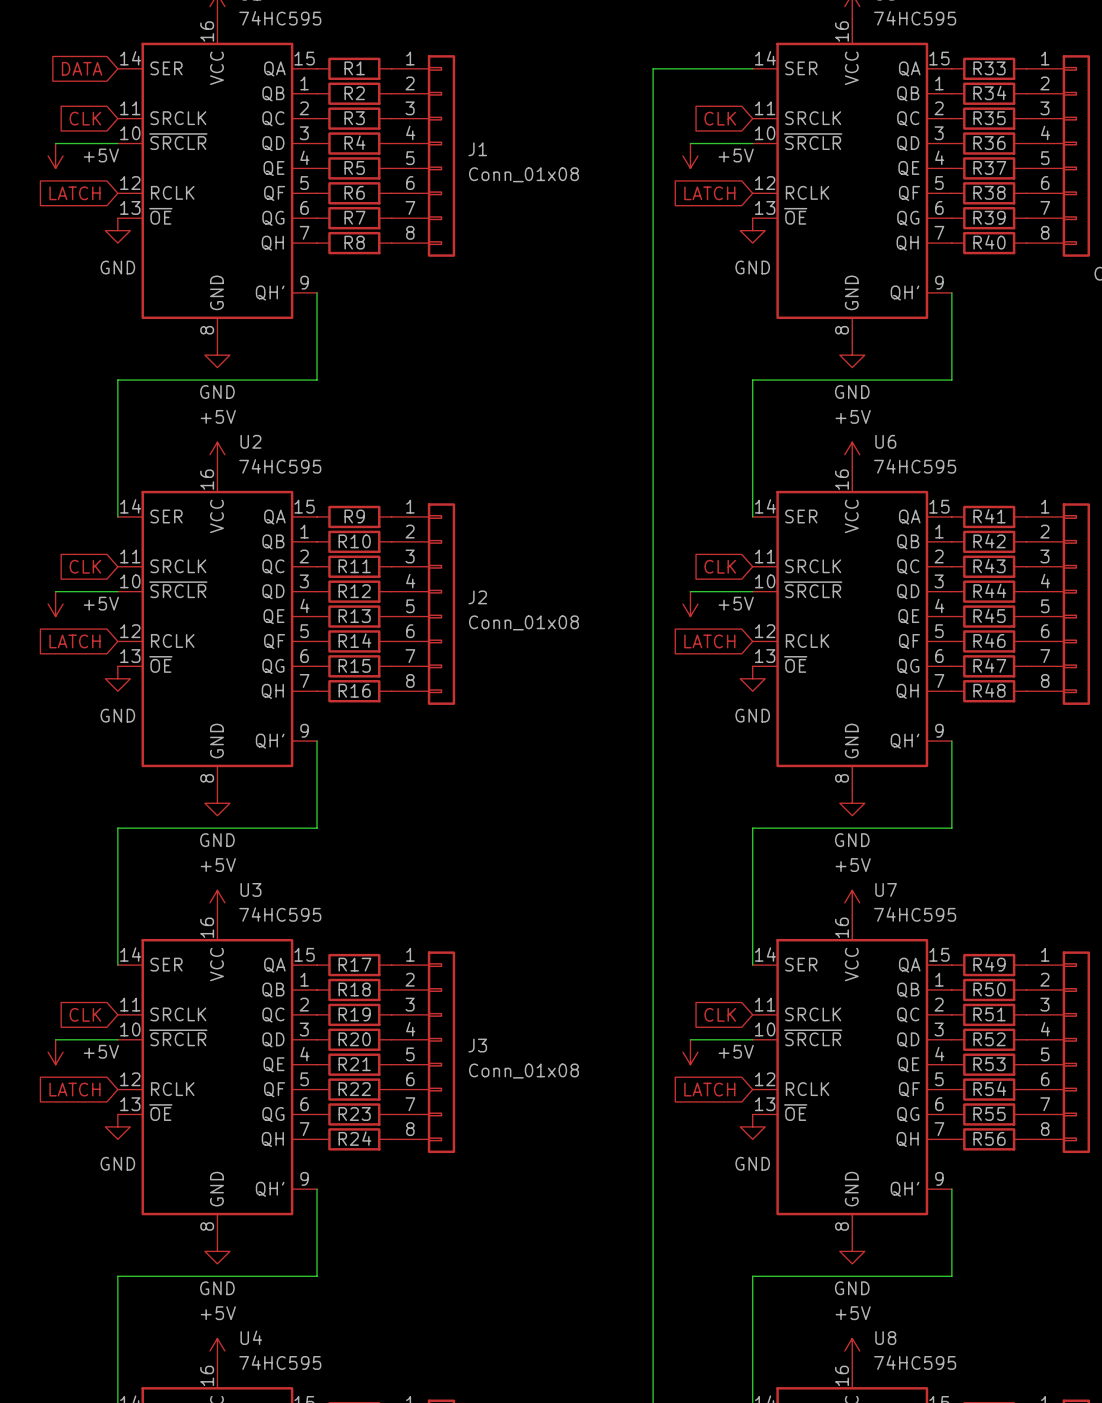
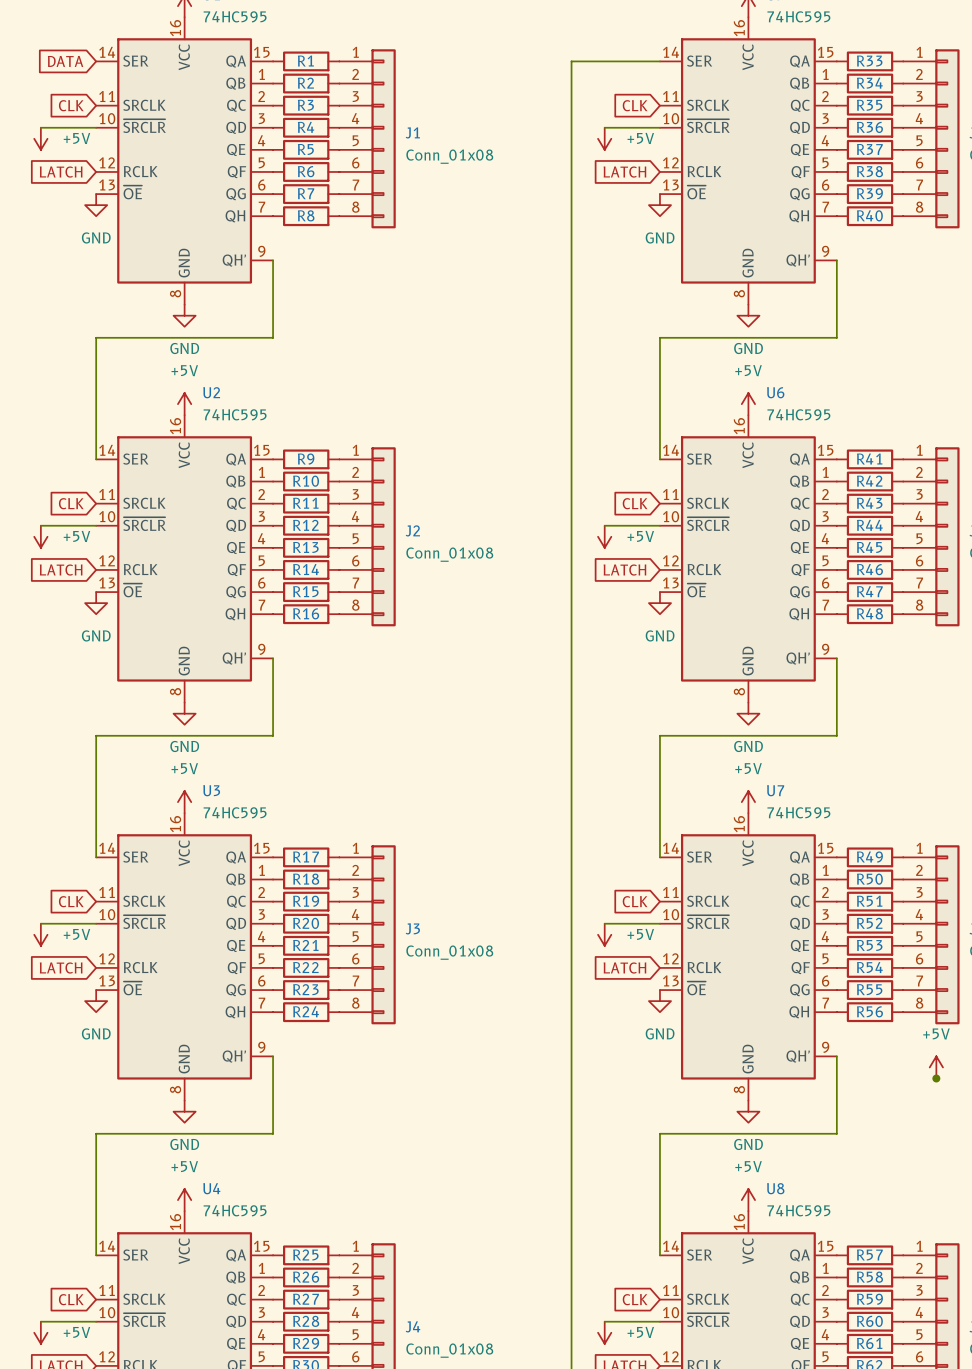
power symbol: none -> +5V (936, 1067)
junction: none -> (936, 1078)

